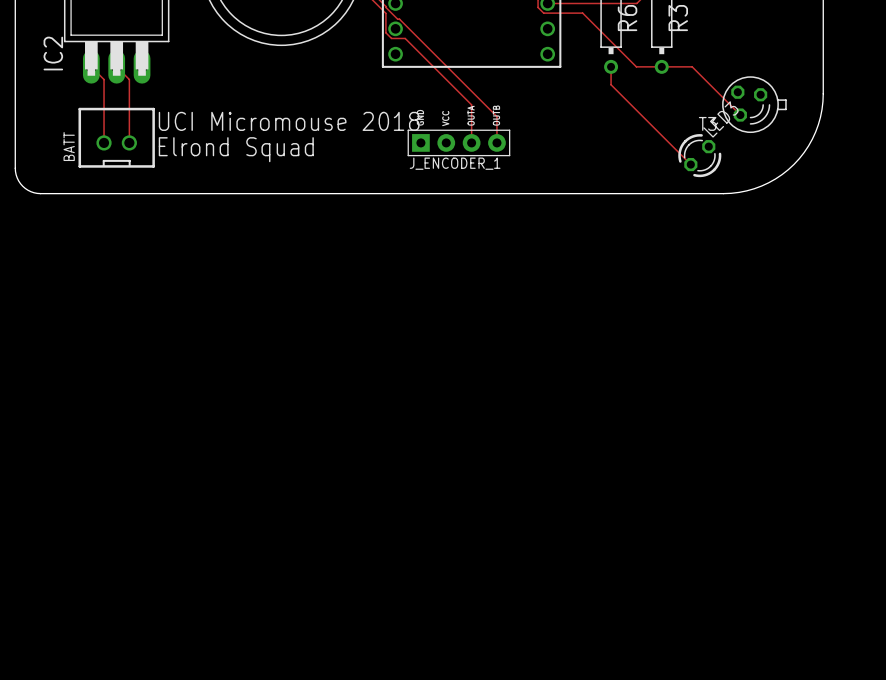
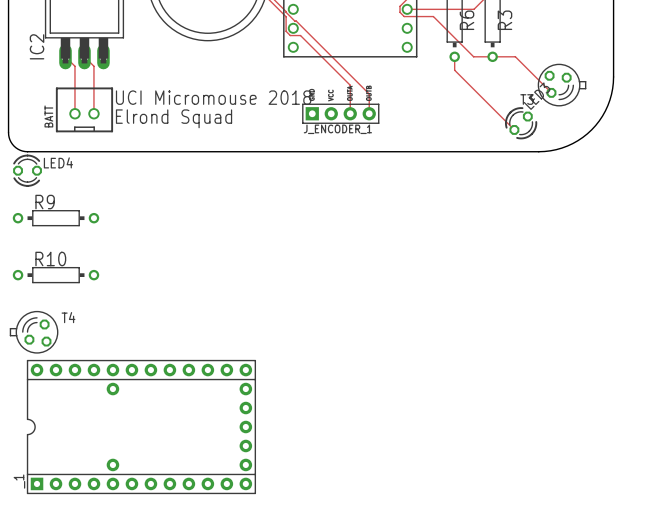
LED4: none -> (27, 170)
R9: none -> (56, 218)
R10: none -> (56, 275)
T4: none -> (34, 332)
_1: none -> (141, 427)

